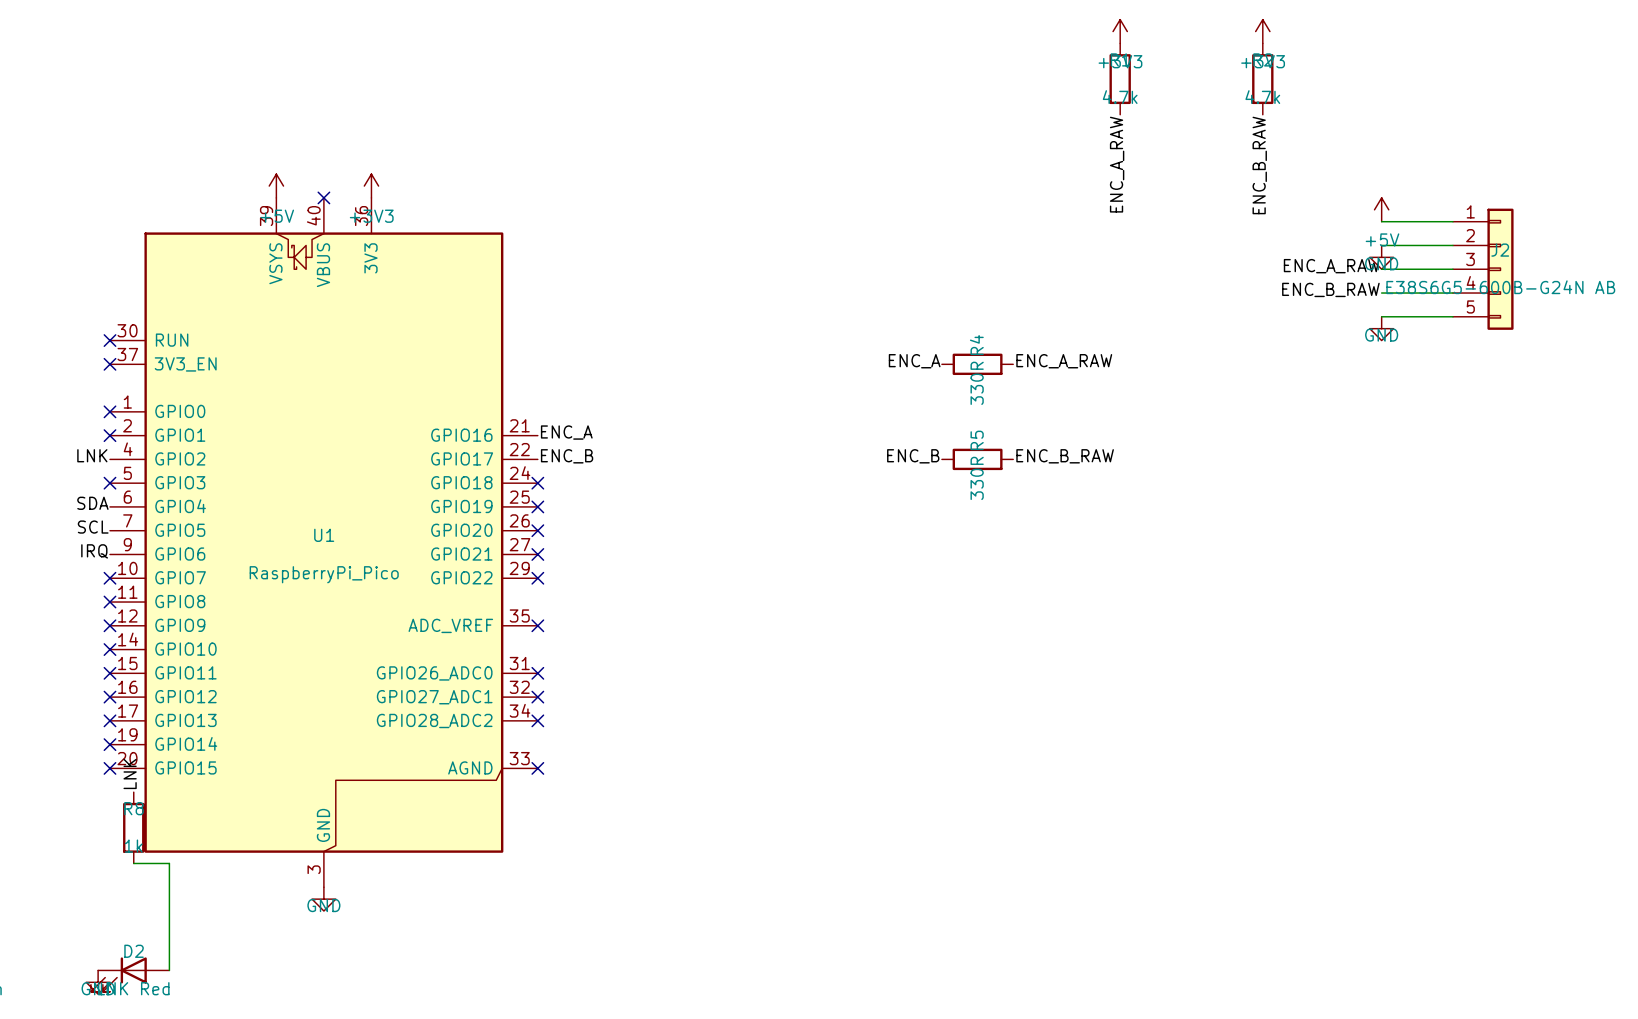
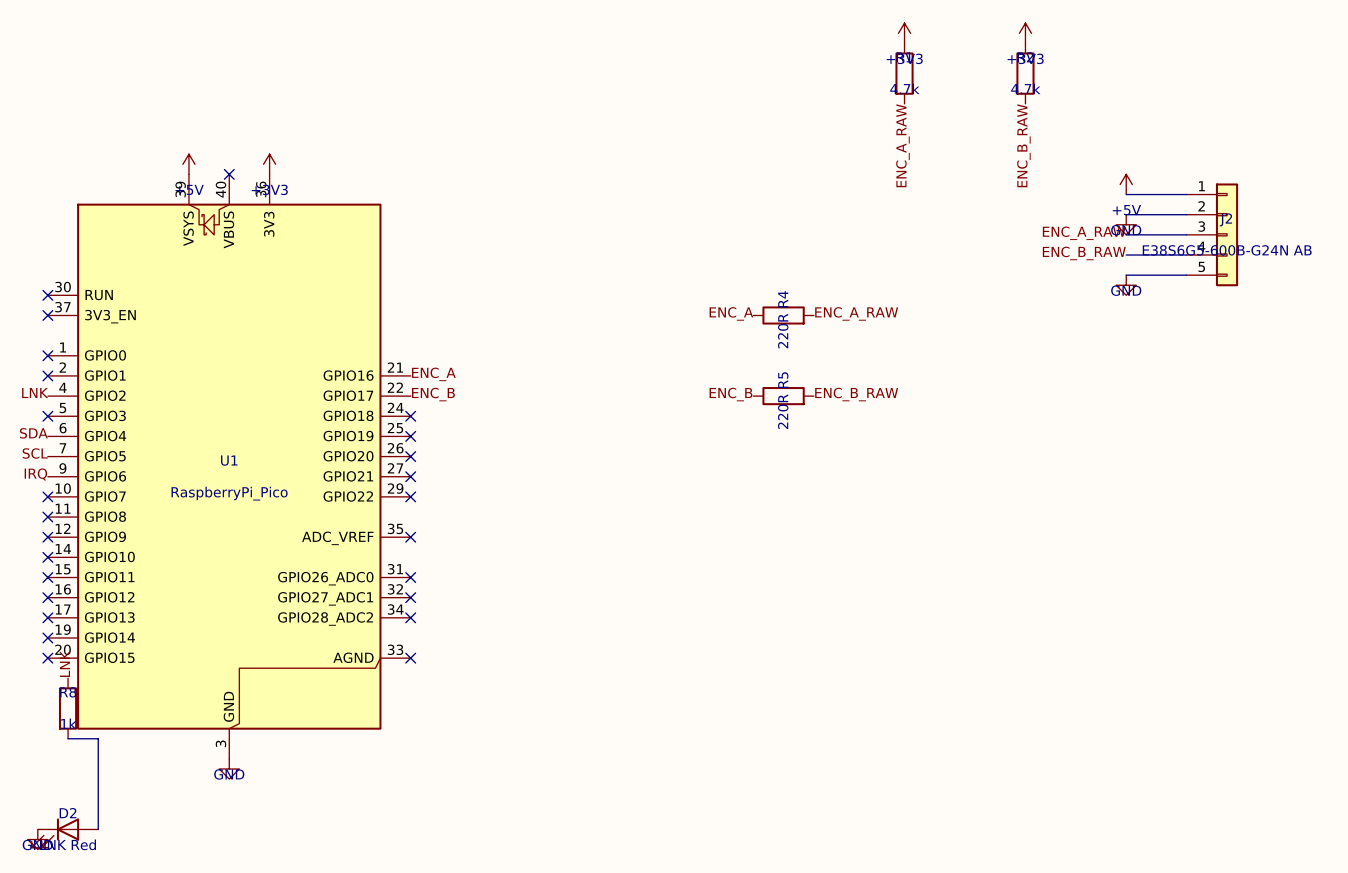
R4 value: 330R (977, 383) -> 220R (783, 331)
R5 value: 330R (977, 478) -> 220R (783, 411)

